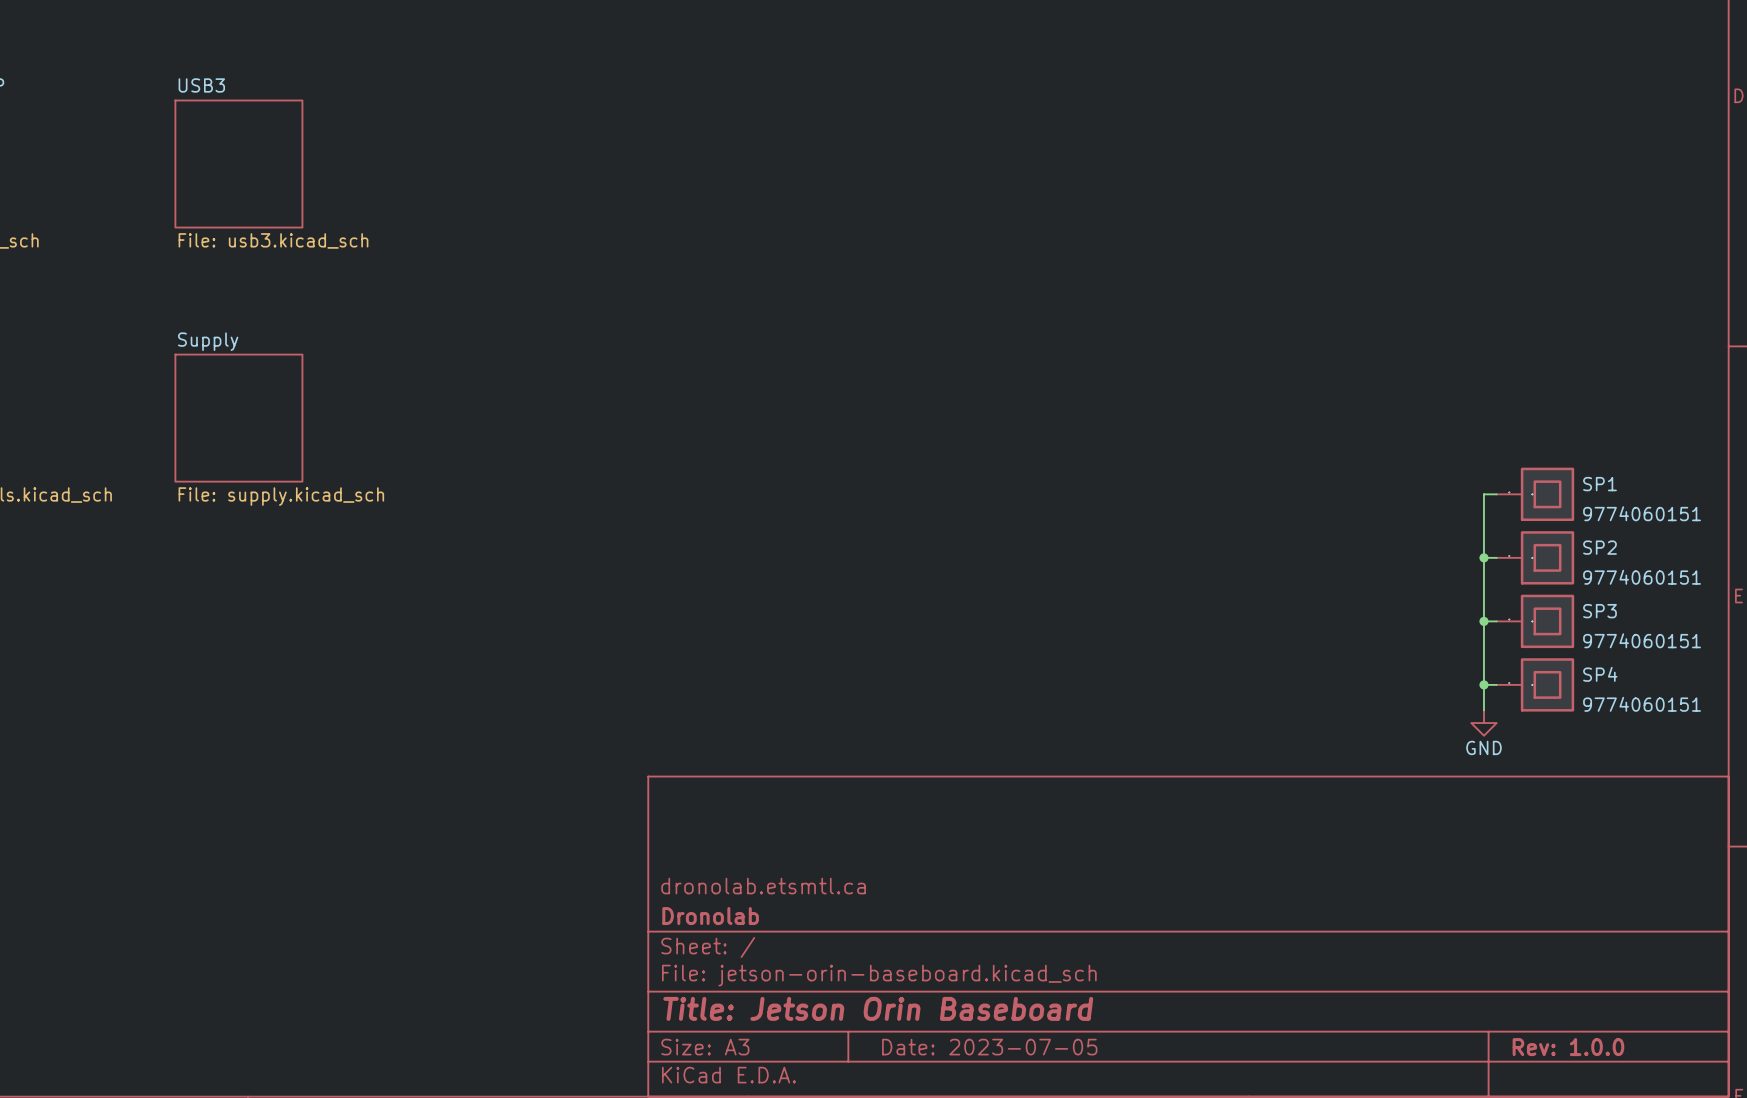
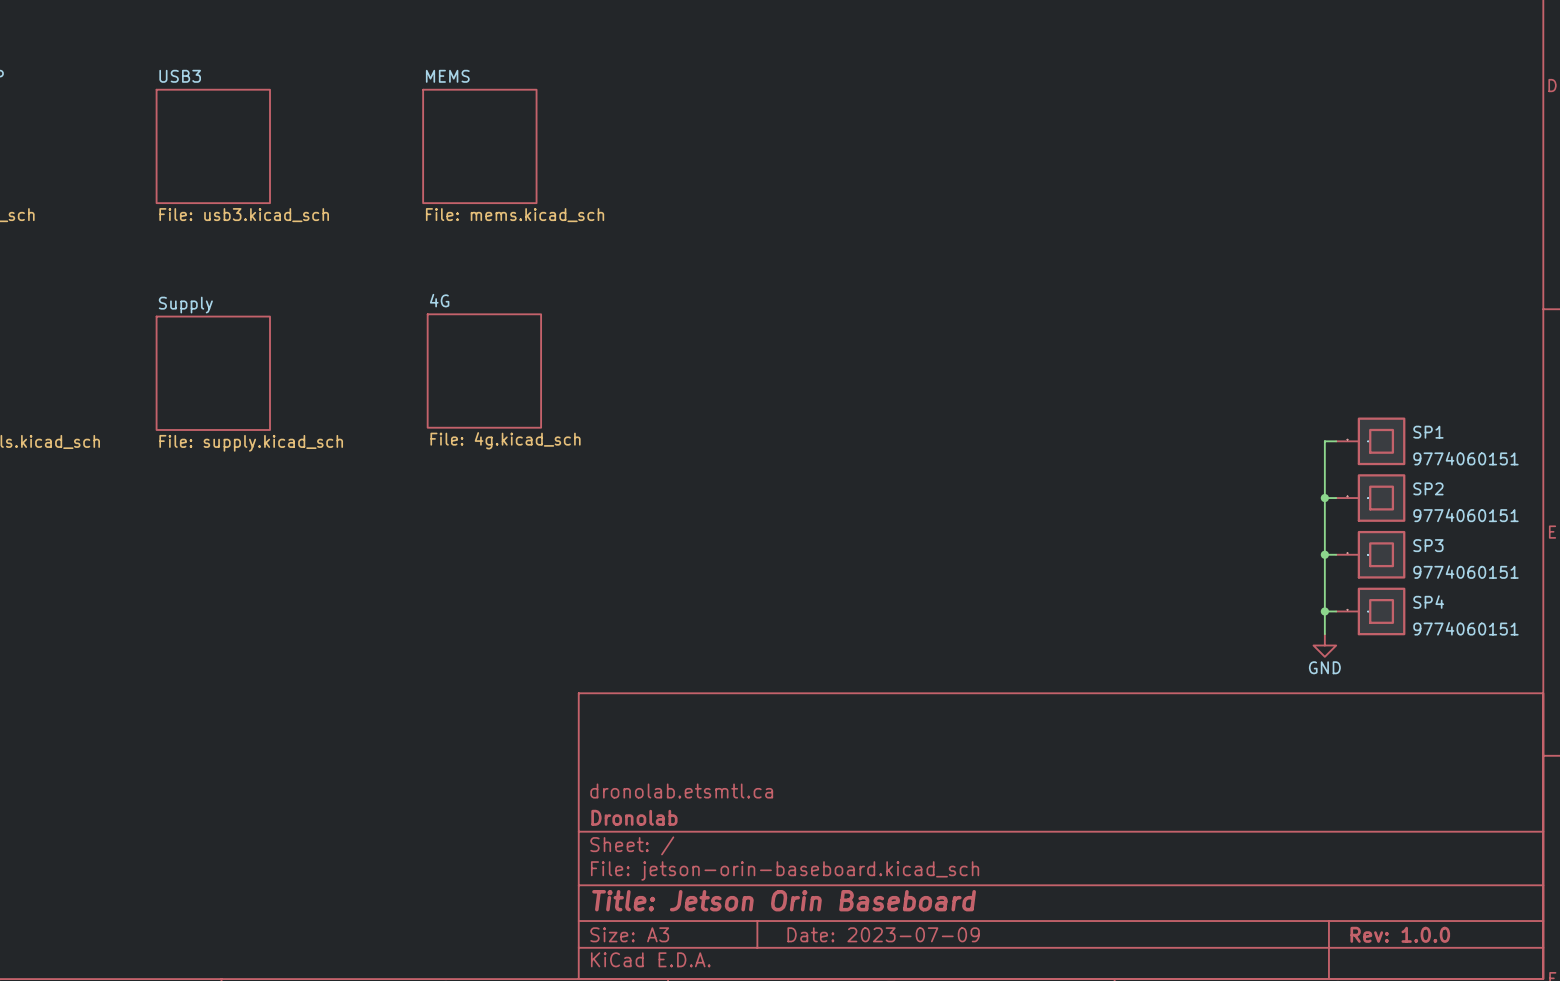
sheet MEMS: none -> File: mems.kicad_sch (479, 146)
sheet 4G: none -> File: 4g.kicad_sch (484, 371)
title block: Date: 2023-07-05 (989, 1047) -> Date: 2023-07-09 (883, 934)

